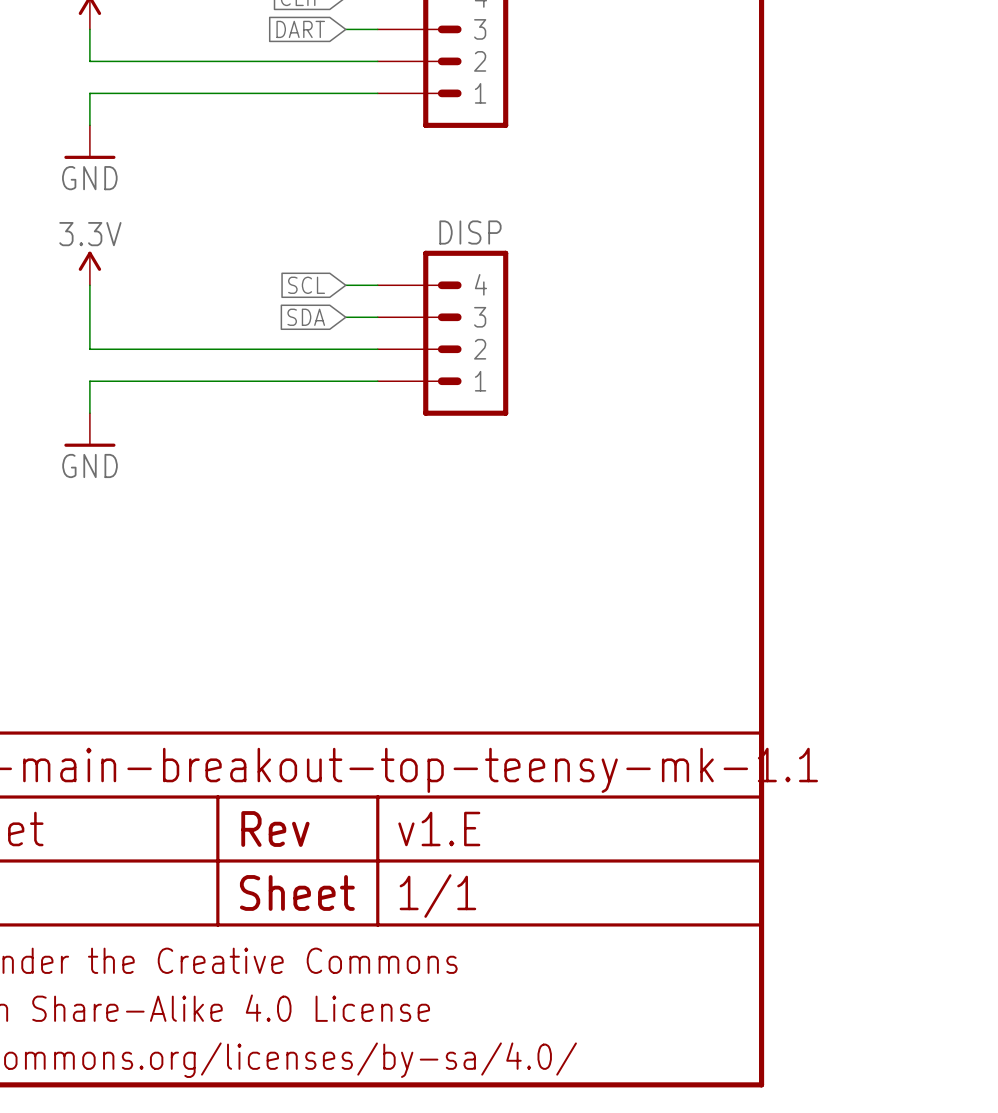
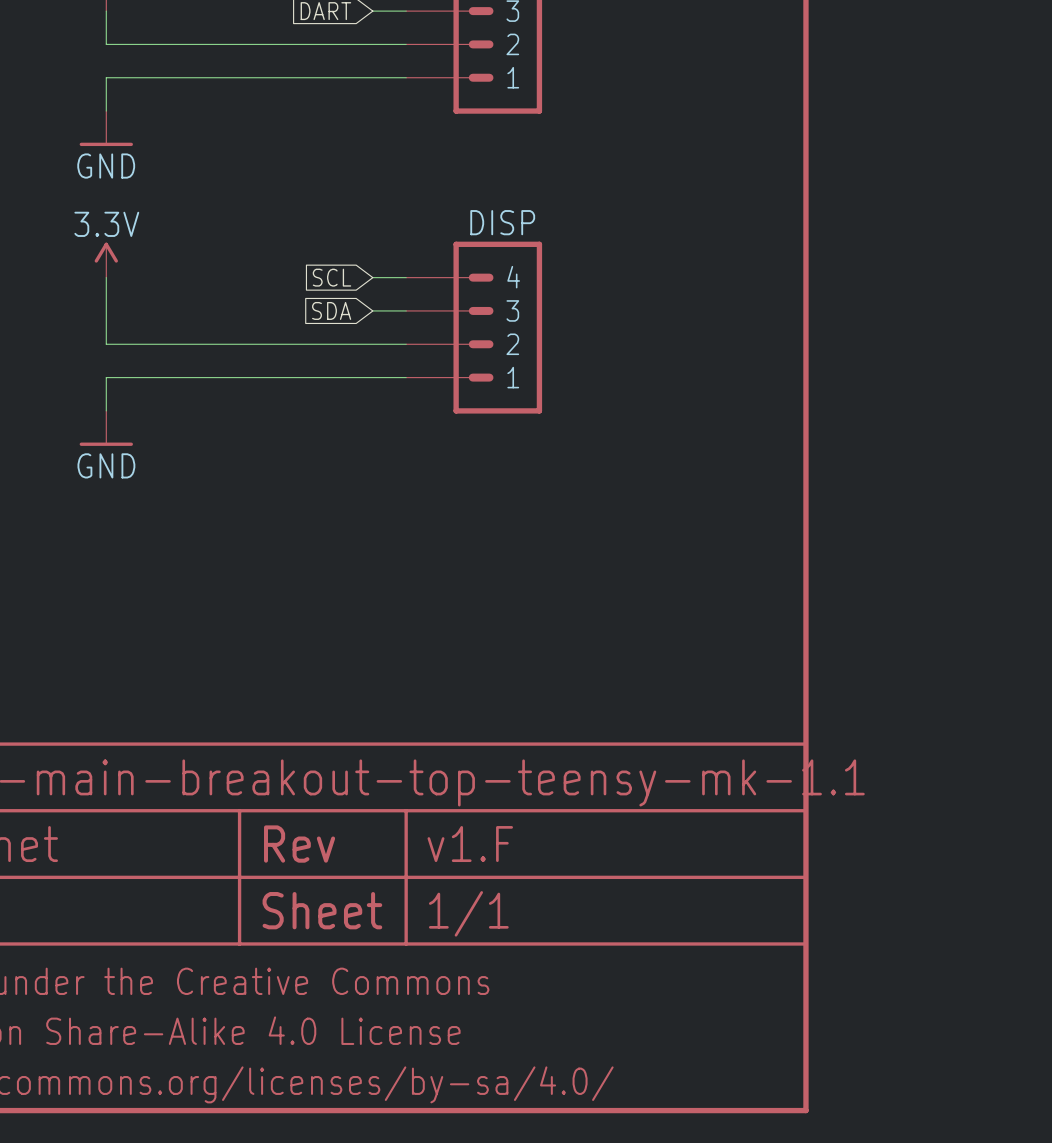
part text: v1.E (439, 829) -> v1.F (470, 844)

